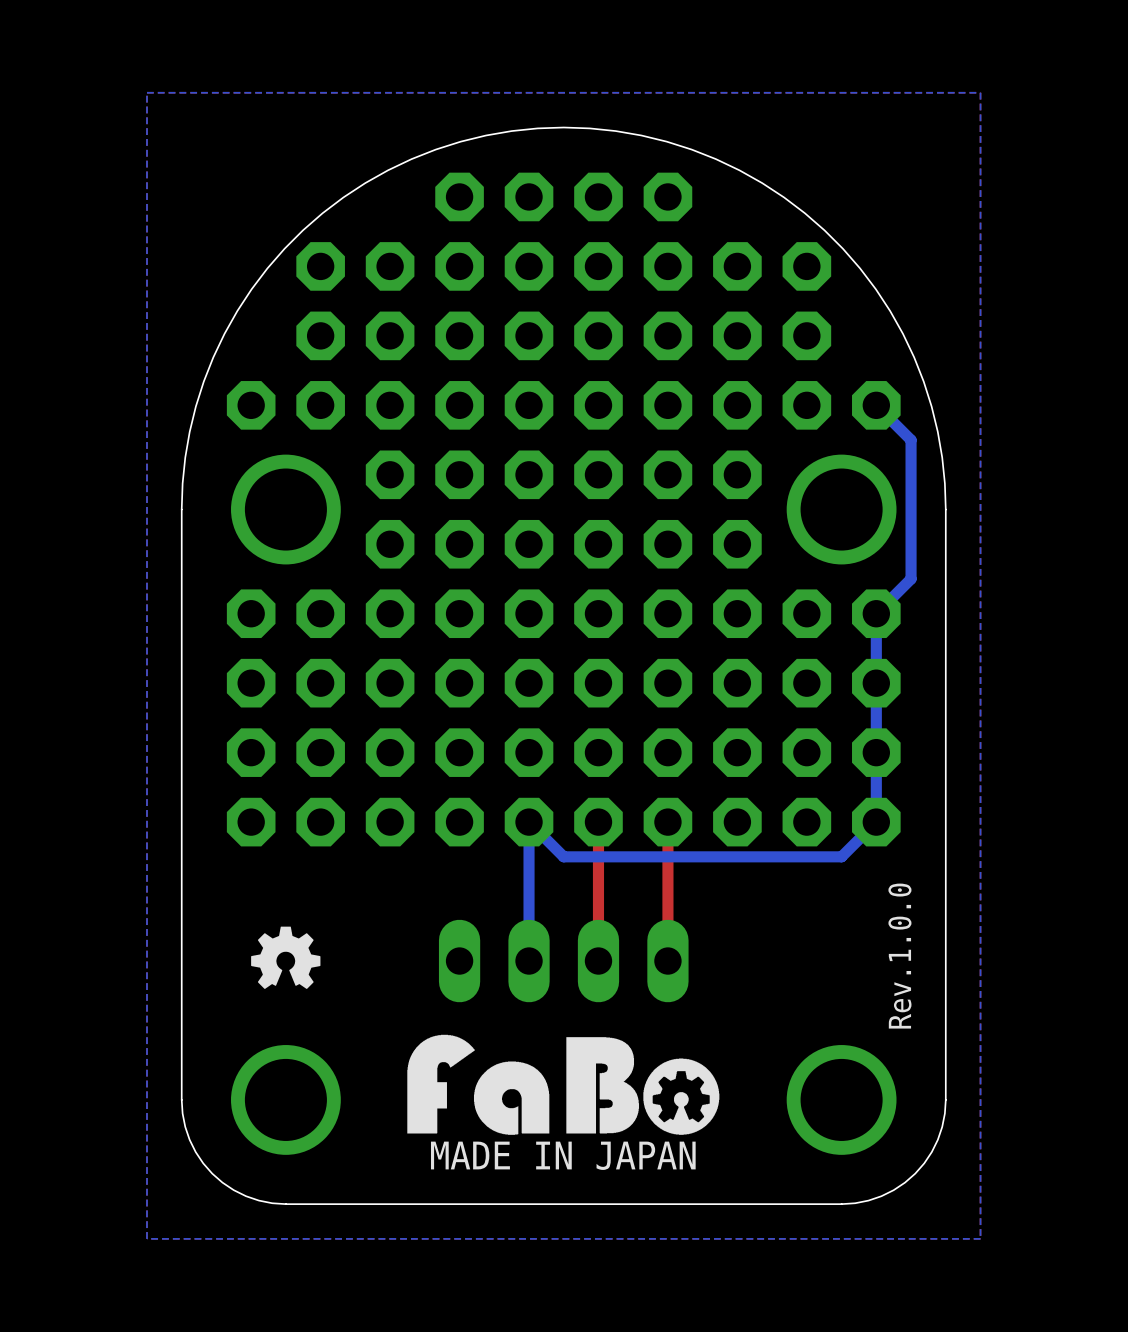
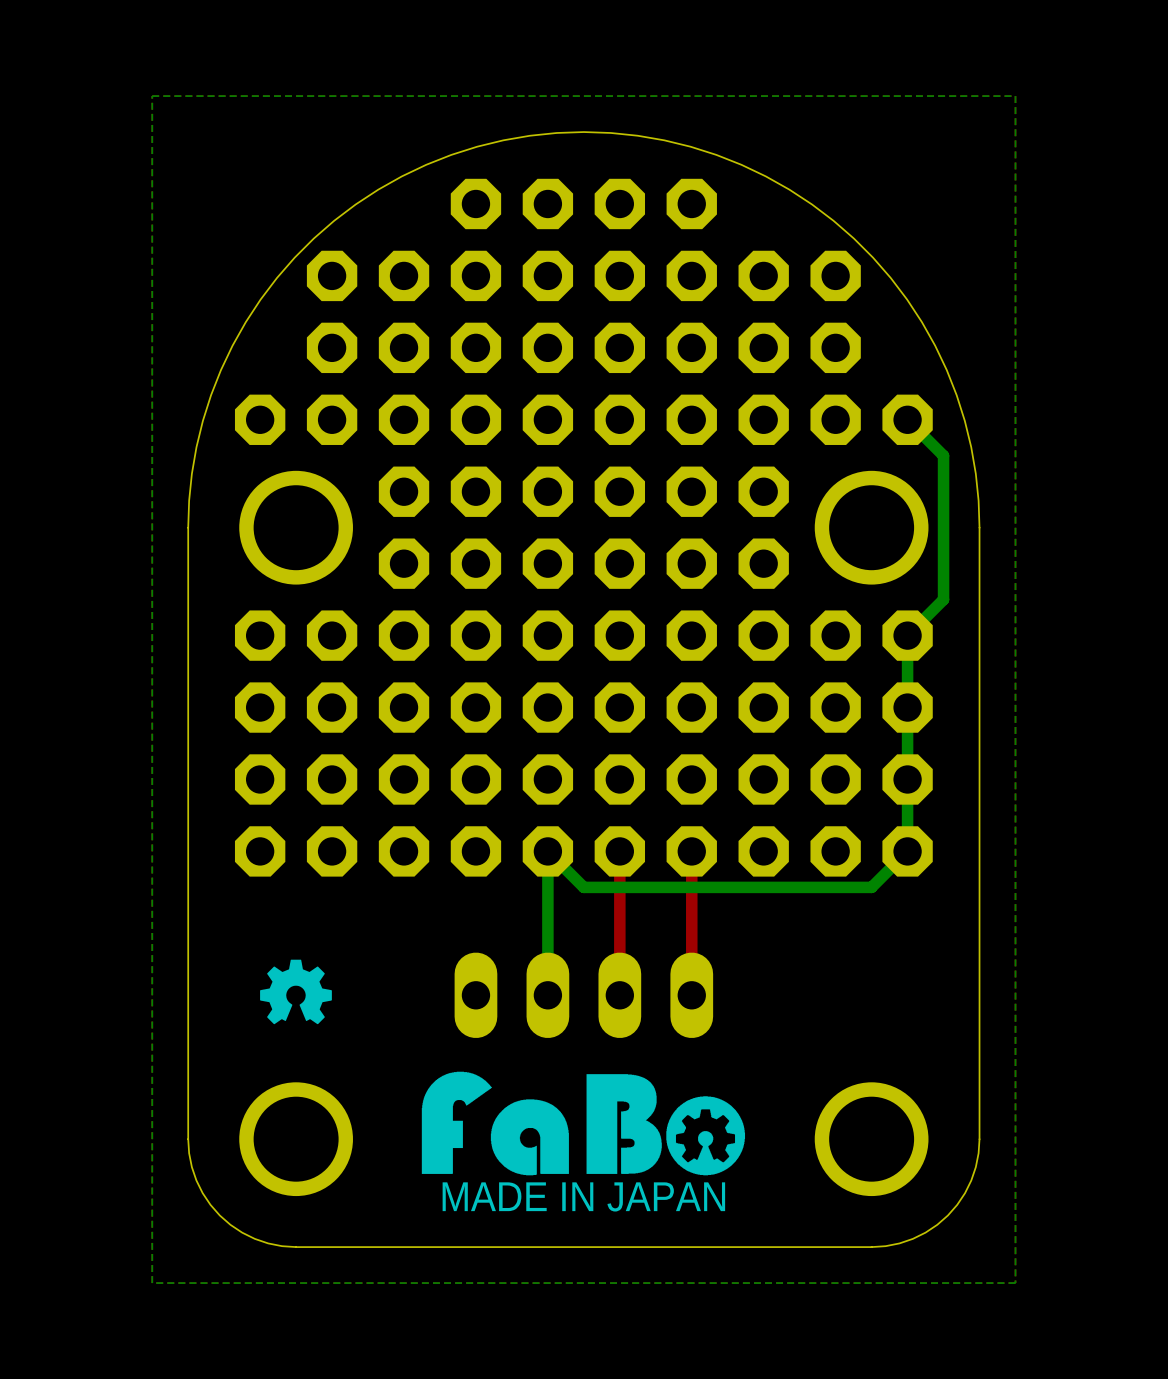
text: Rev.1.0.0 (899, 956) -> none

